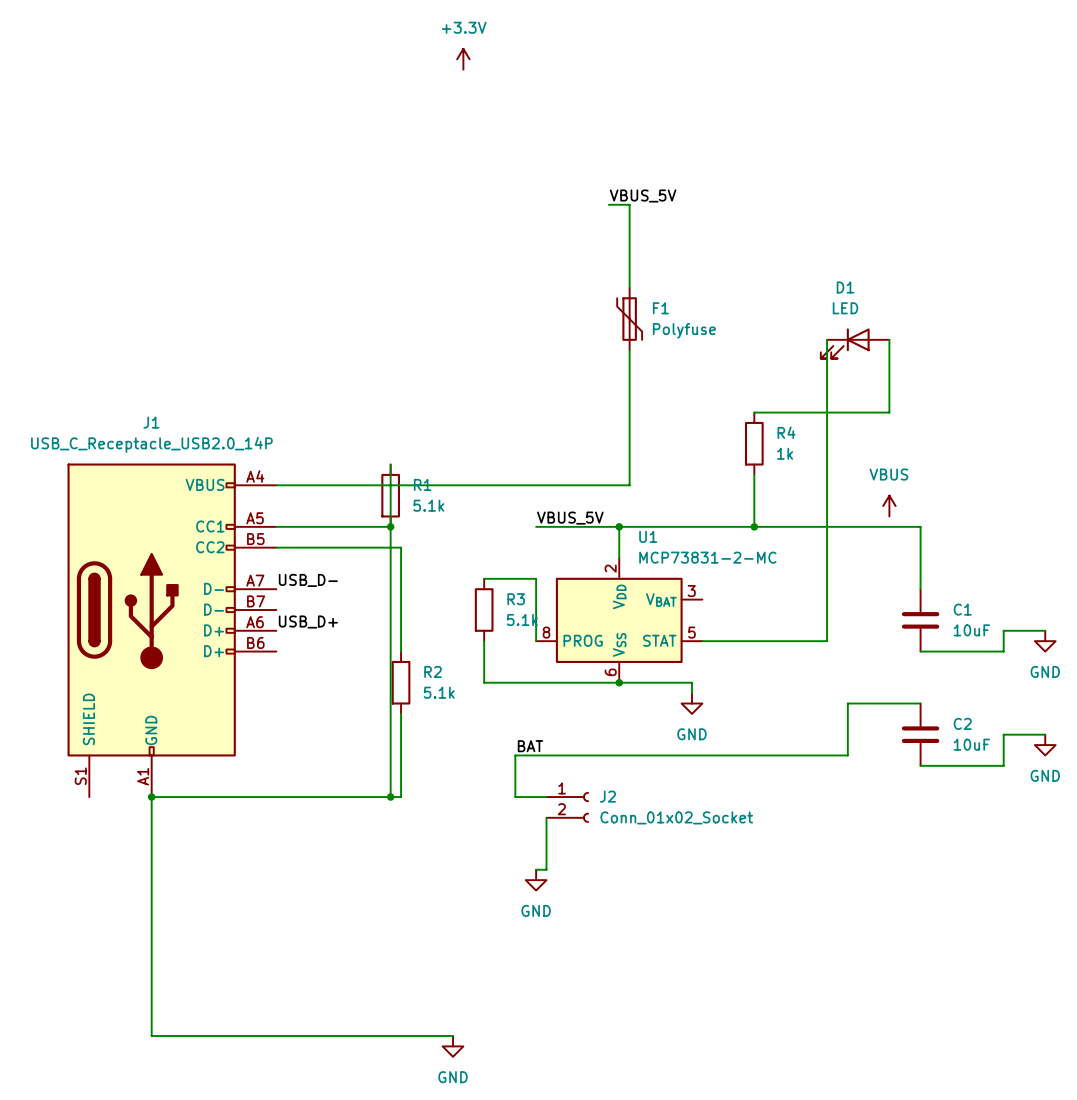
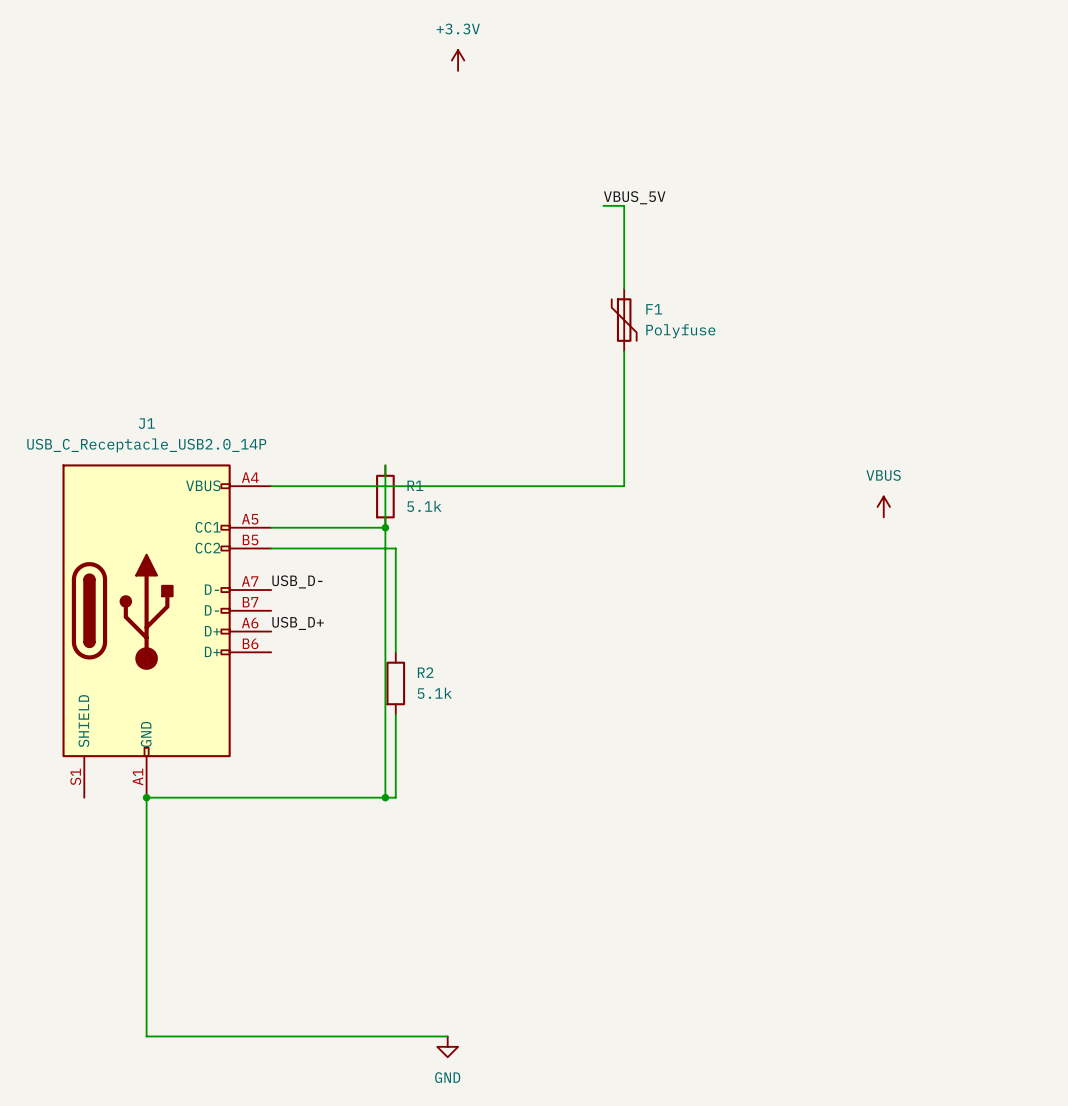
wire: (827, 339) (827, 641) (702, 641) -> none
wire: (889, 339) (889, 412) (754, 412) -> none
D1: LED (855, 343) -> none
R4: 1k (754, 443) -> none
wire: (754, 474) (754, 526) -> none
label: VBUS_5V (570, 518) -> none
wire: (536, 526) (920, 526) (920, 589) -> none
wire: (619, 526) (619, 558) -> none
junction: (619, 526) -> none
junction: (754, 526) -> none
wire: (484, 578) (536, 578) (536, 641) -> none
R3: 5.1k (484, 609) -> none
U1: MCP73831-2-MC (619, 620) -> none
C1: 10uF (920, 620) -> none
wire: (1045, 630) (1003, 630) (1003, 651) (920, 651) -> none
wire: (484, 641) (484, 682) (691, 682) (691, 693) -> none
power symbol: GND (1045, 641) -> none
junction: (619, 682) -> none
power symbol: GND (691, 703) -> none
wire: (920, 703) (847, 703) (847, 755) (515, 755) (515, 797) (546, 797) -> none
C2: 10uF (920, 734) -> none
wire: (1045, 734) (1003, 734) (1003, 765) (920, 765) -> none
power symbol: GND (1045, 745) -> none
label: BAT (530, 746) -> none
J2: Conn_01x02_Socket (567, 807) -> none
wire: (546, 817) (546, 869) (536, 869) -> none
power symbol: GND (536, 880) -> none

